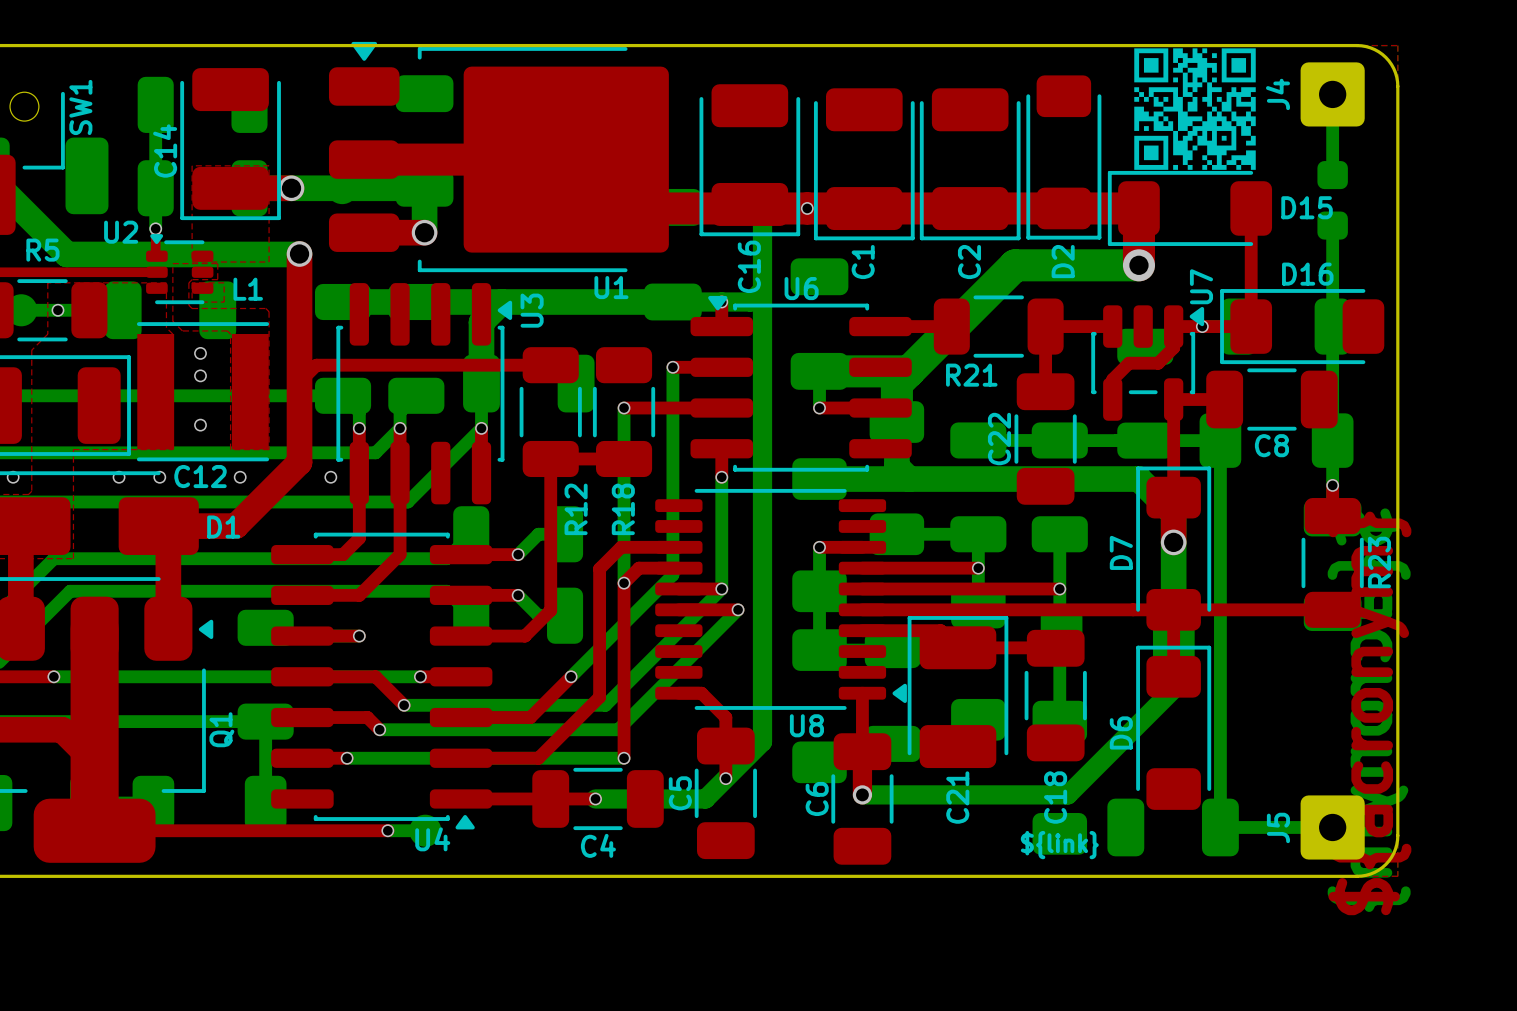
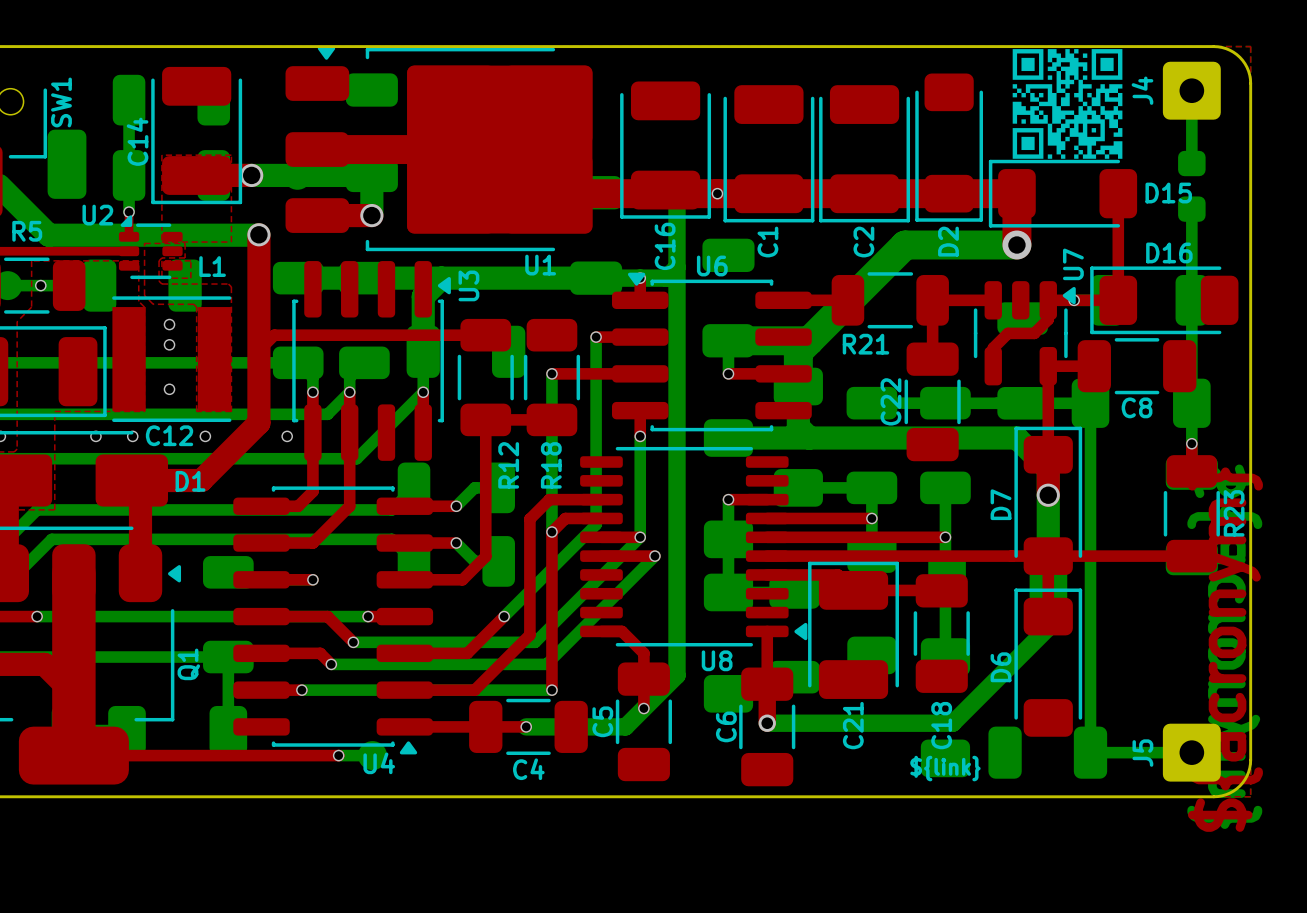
U1 footprint: [328, 41, 669, 273] -> [285, 46, 593, 252]
U2 footprint: [146, 234, 214, 305] -> [118, 215, 183, 280]
U7 footprint: [1091, 305, 1205, 421] -> [973, 281, 1076, 386]

